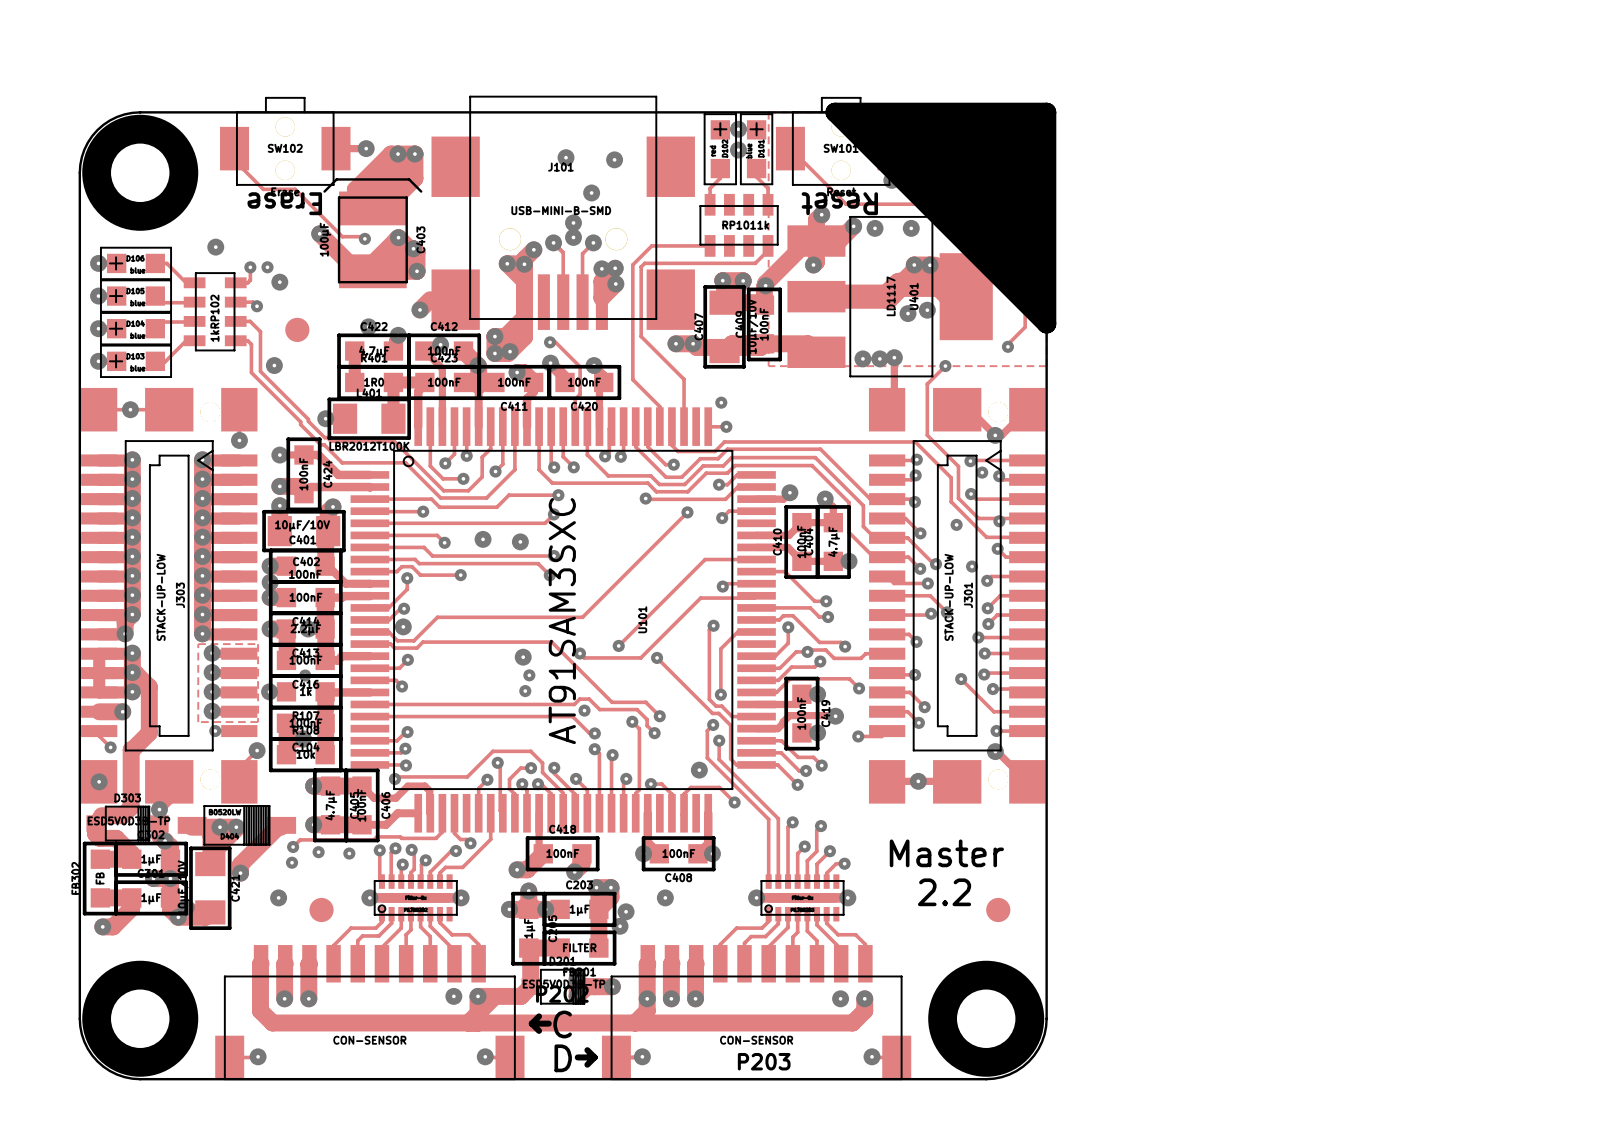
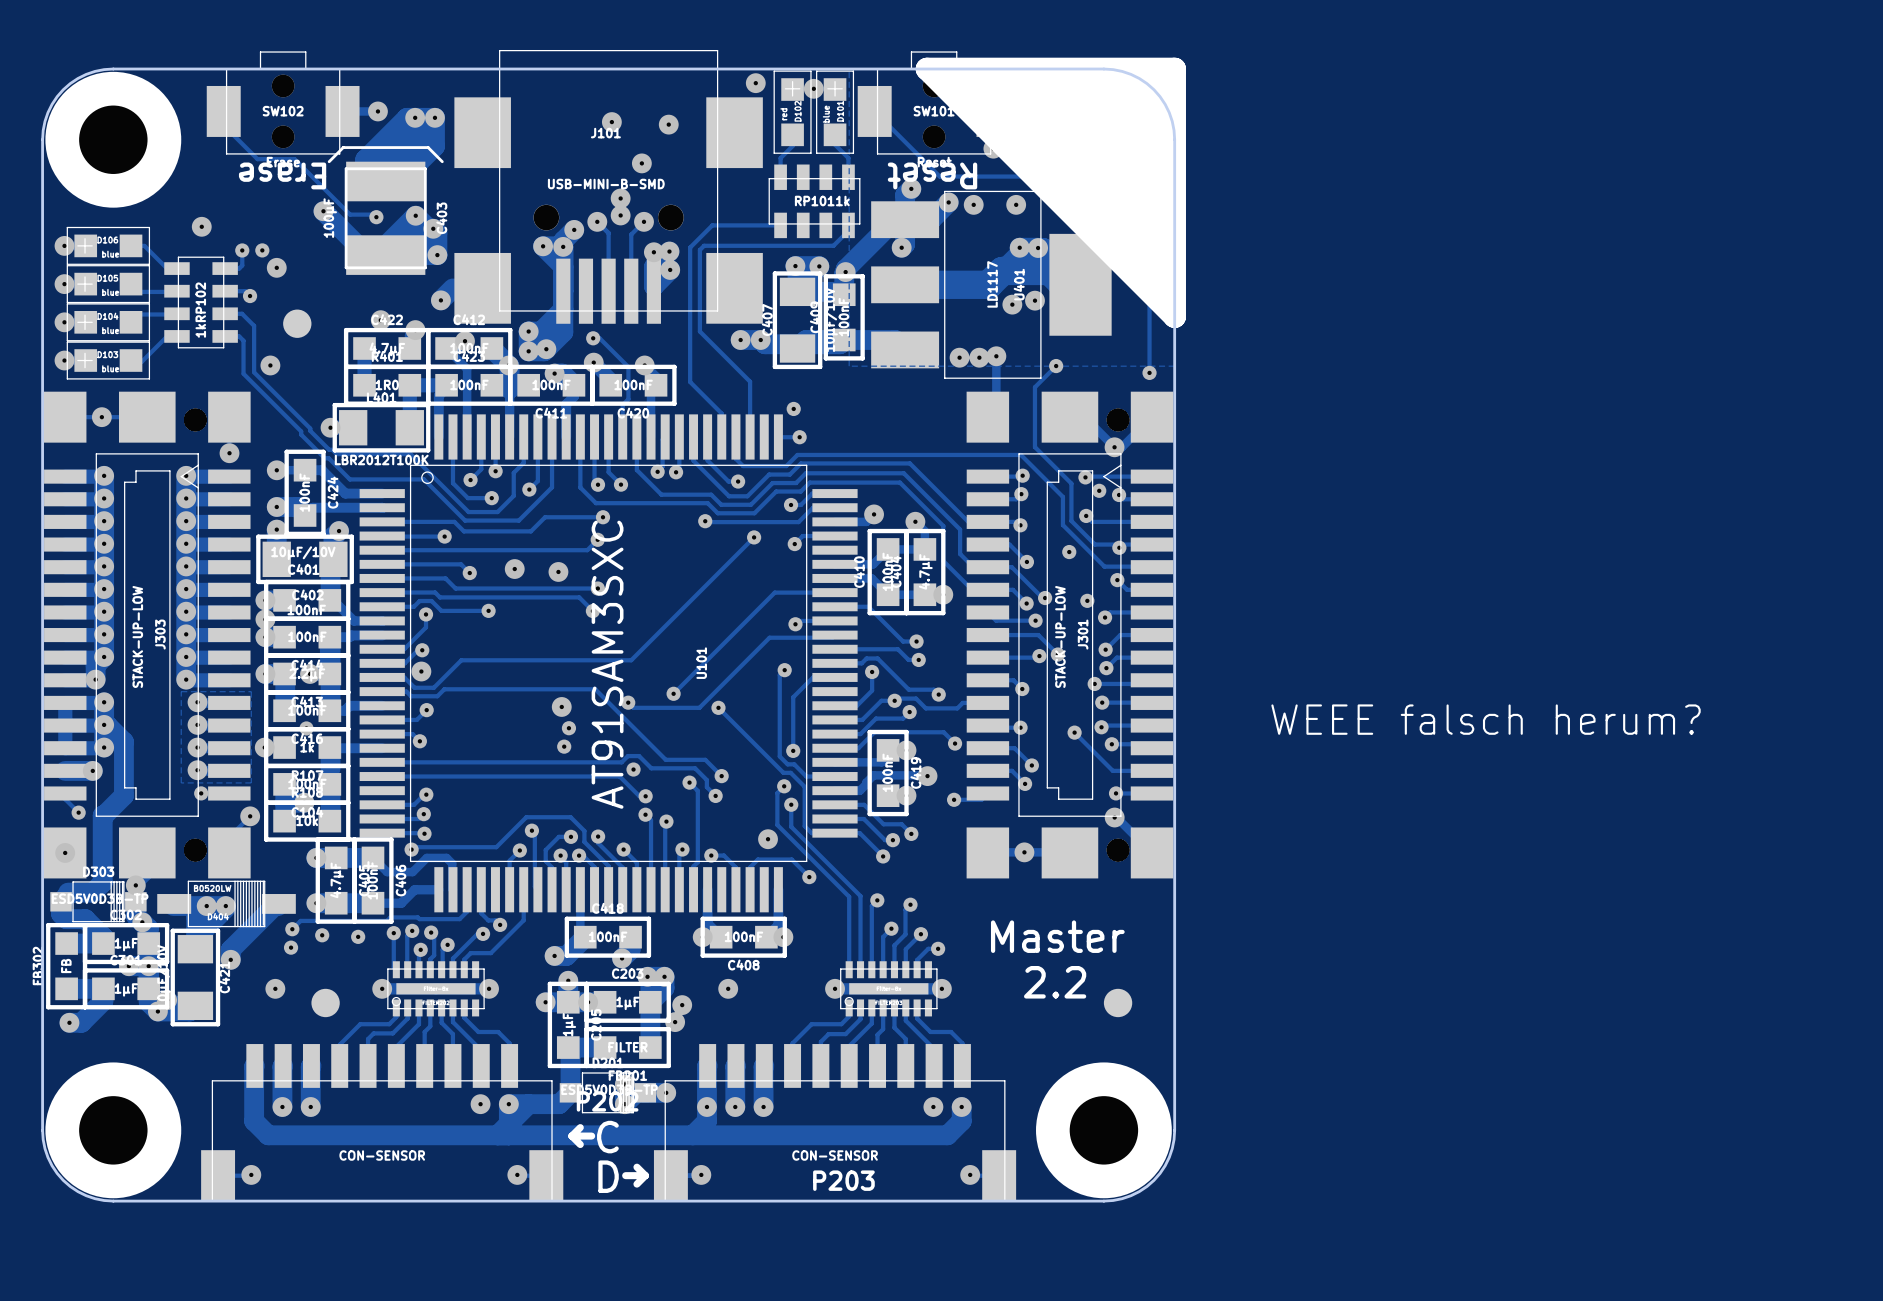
via position: (738, 150) -> (755, 83)
track: (1025, 327) (1007, 344) (1007, 346) -> (1149, 320) (1149, 372)
via position: (1007, 346) -> (1149, 372)
text: none -> WEEE falsch herum? (1486, 719)

